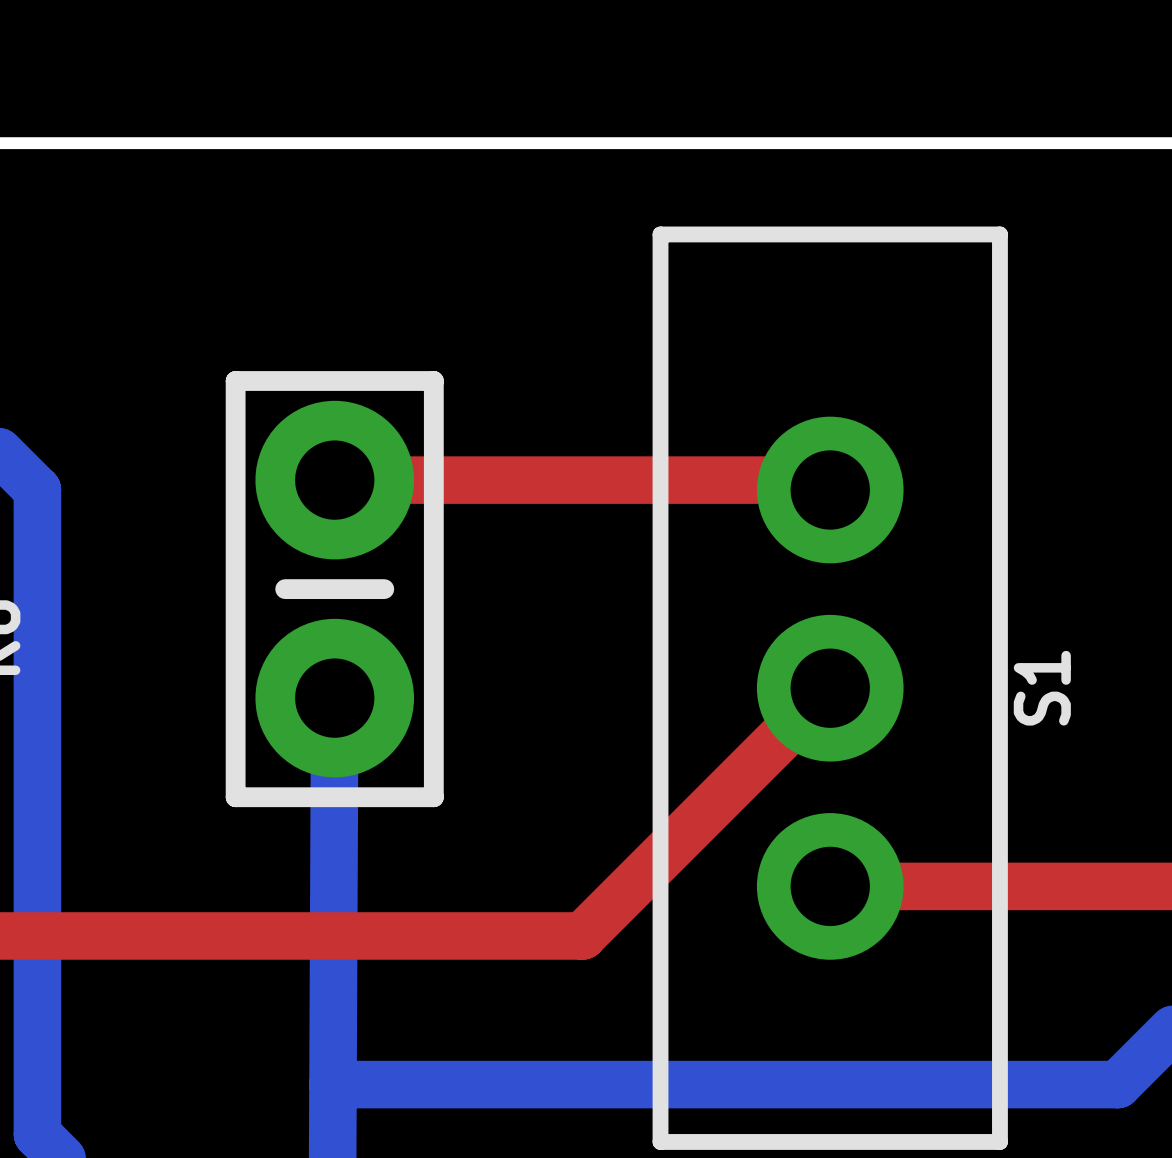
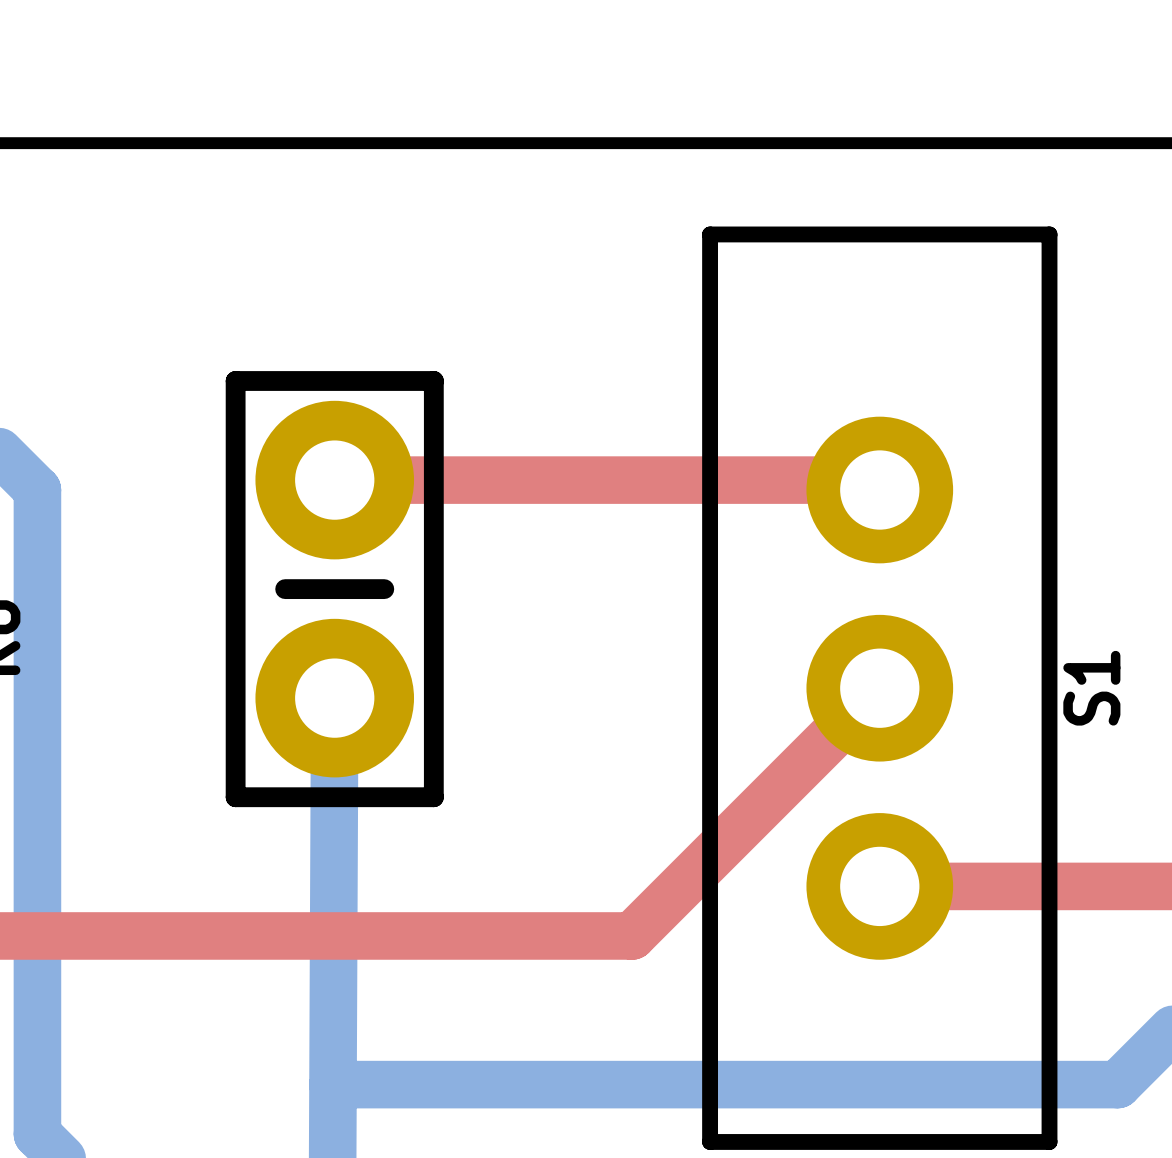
top track: (830, 688) (582, 935) -> (879, 688) (632, 935) (582, 935)
S1 position: (830, 688) -> (879, 688)

